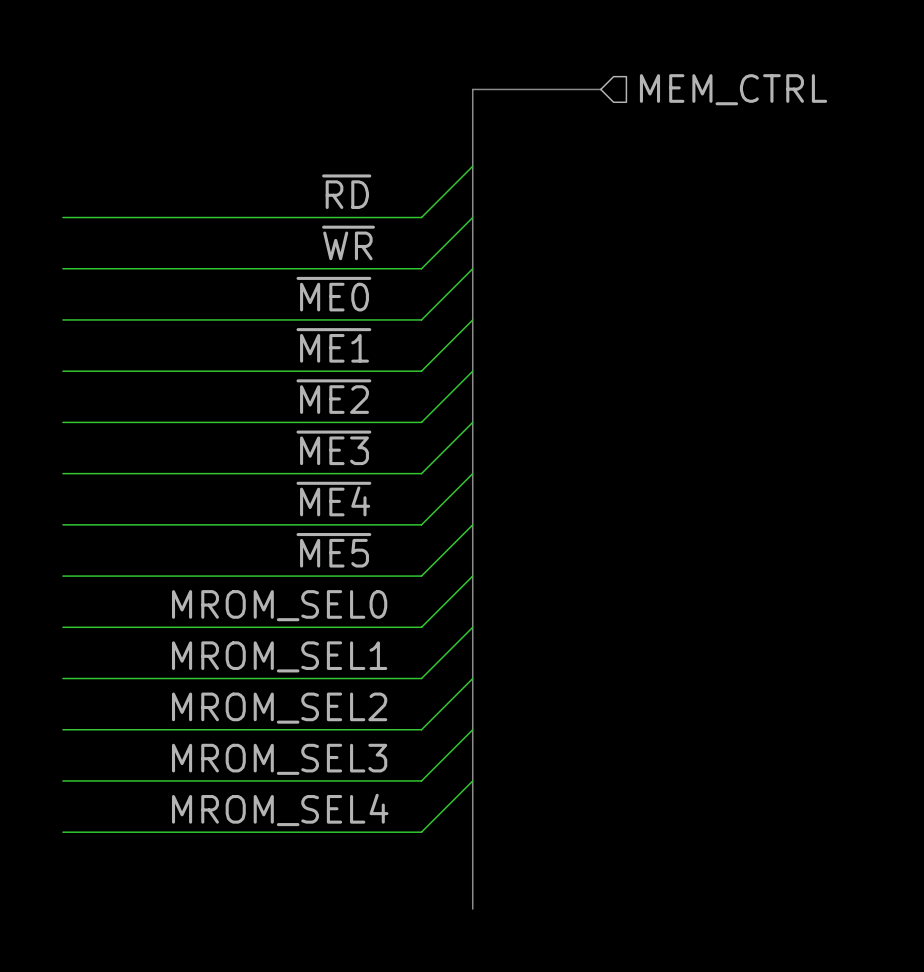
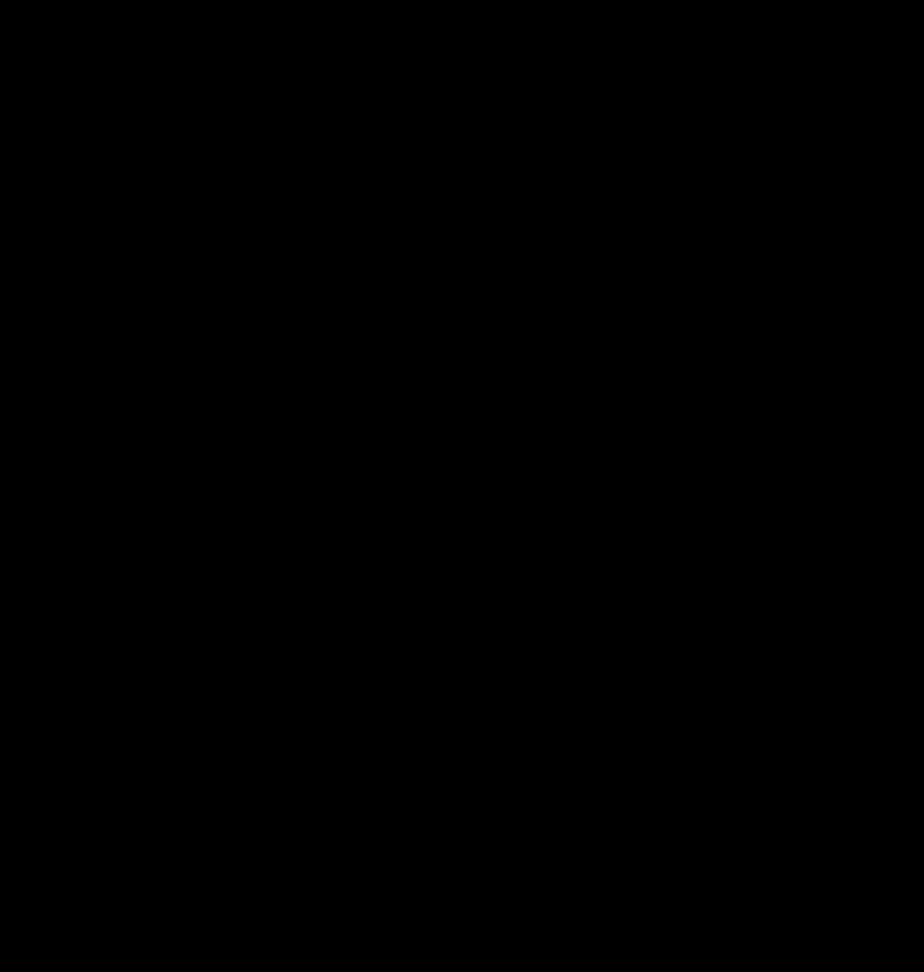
bus: (600, 89) (472, 89) (472, 909) -> none
hierarchical label: MEM_CTRL (733, 89) -> none
wire: (472, 166) (421, 217) (62, 217) -> none
label: ~{RD} (346, 191) -> none
wire: (472, 217) (421, 268) (62, 268) -> none
label: ~{WR} (348, 242) -> none
wire: (472, 268) (421, 319) (62, 319) -> none
label: ~{ME0} (333, 294) -> none
wire: (472, 319) (421, 371) (62, 371) -> none
label: ~{ME1} (333, 345) -> none
wire: (472, 371) (421, 422) (62, 422) -> none
label: ~{ME2} (333, 396) -> none
wire: (472, 422) (421, 473) (62, 473) -> none
label: ~{ME3} (333, 447) -> none
wire: (472, 473) (421, 524) (62, 524) -> none
label: ~{ME4} (333, 499) -> none
wire: (472, 524) (421, 576) (62, 576) -> none
label: ~{ME5} (333, 550) -> none
wire: (472, 576) (421, 627) (62, 627) -> none
label: MROM_SEL0 (279, 605) -> none
wire: (472, 627) (421, 678) (62, 678) -> none
label: MROM_SEL1 (279, 656) -> none
wire: (472, 678) (421, 729) (62, 729) -> none
label: MROM_SEL2 (279, 708) -> none
wire: (472, 729) (421, 780) (62, 780) -> none
label: MROM_SEL3 (279, 759) -> none
wire: (472, 780) (421, 832) (62, 832) -> none
label: MROM_SEL4 (280, 809) -> none

